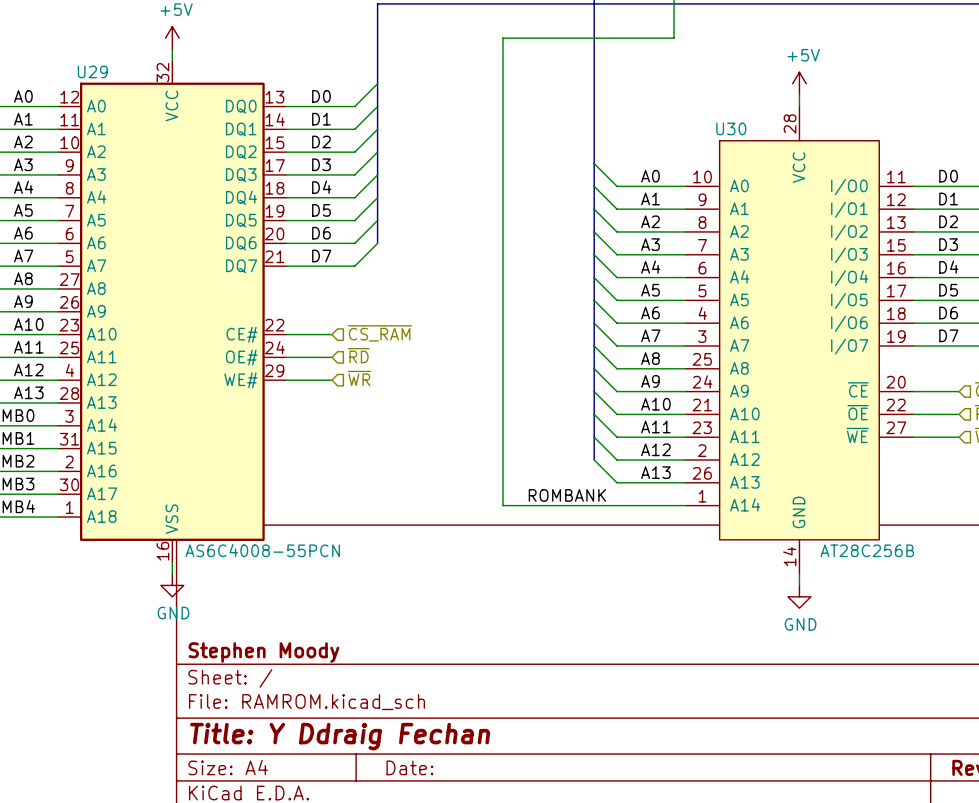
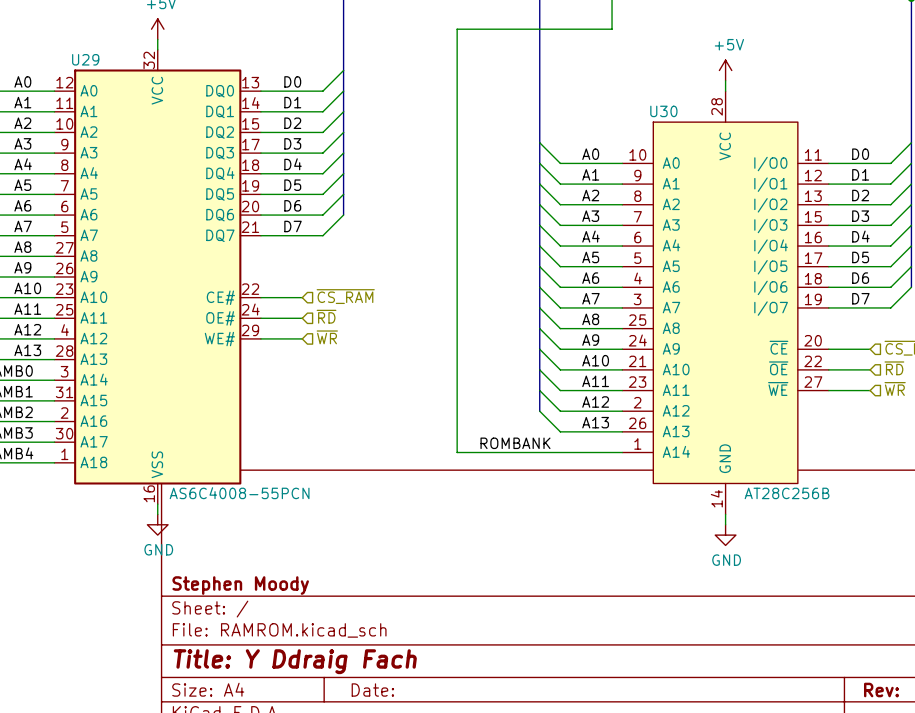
title block: Title: Y Ddraig Fechan (340, 736) -> Title: Y Ddraig Fach (295, 661)

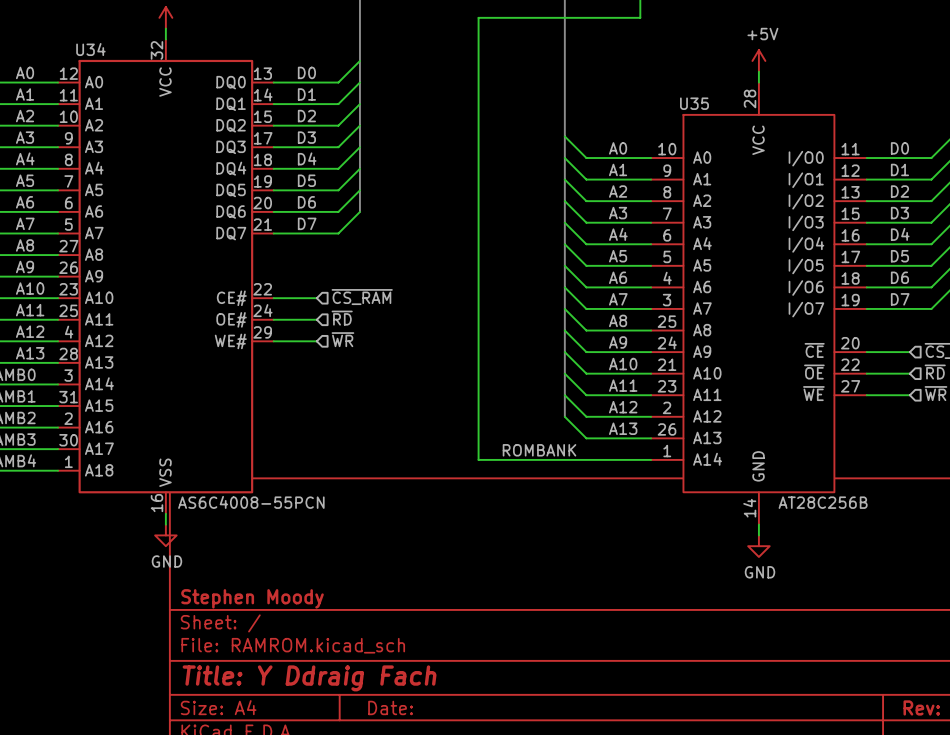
U29 name: U29 (85, 59) -> U34 (90, 49)
U30 name: U30 (663, 111) -> U35 (694, 103)

